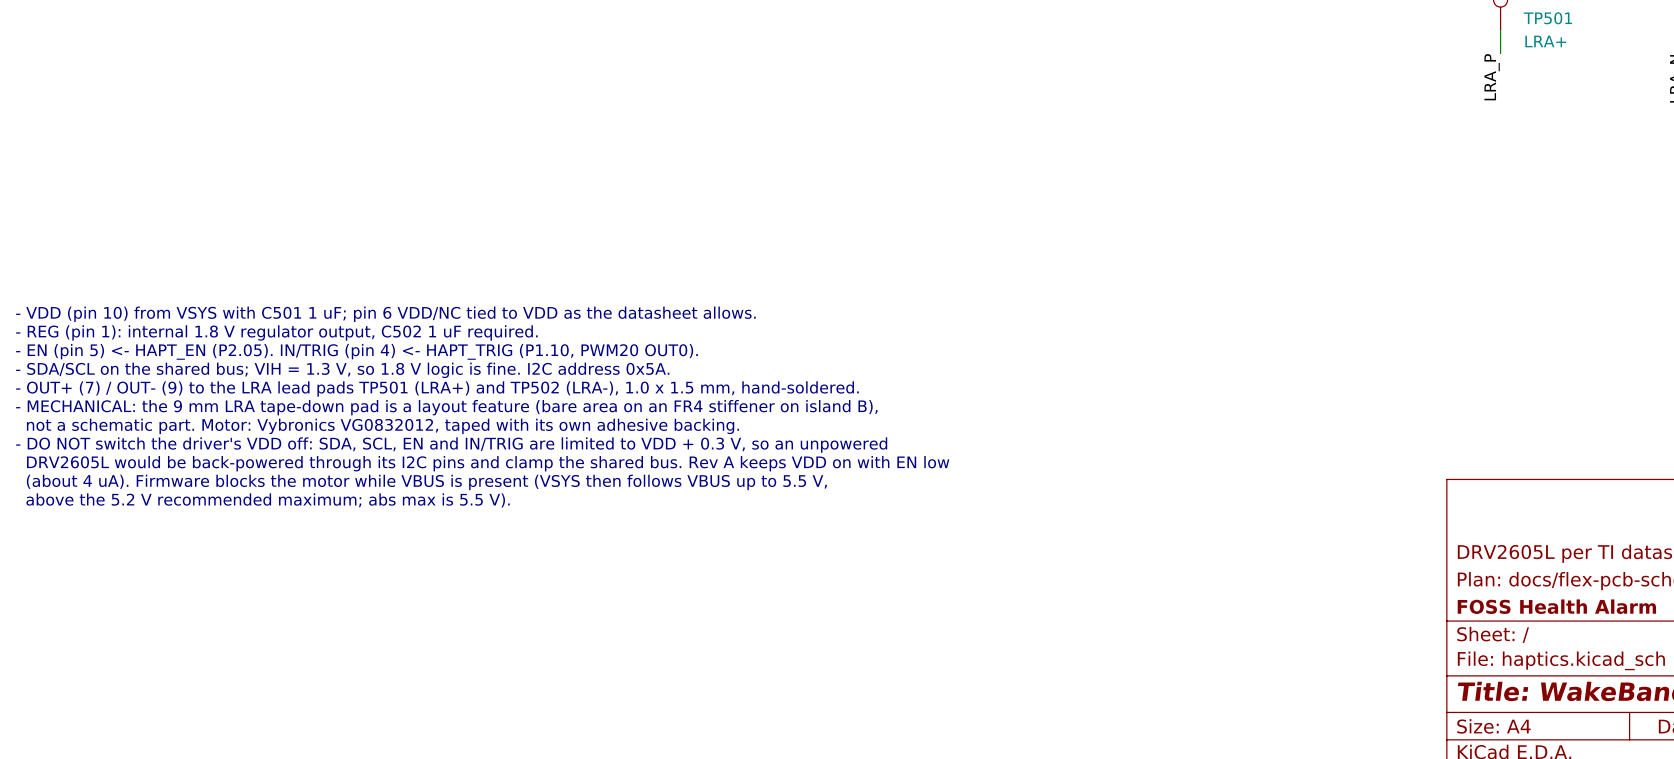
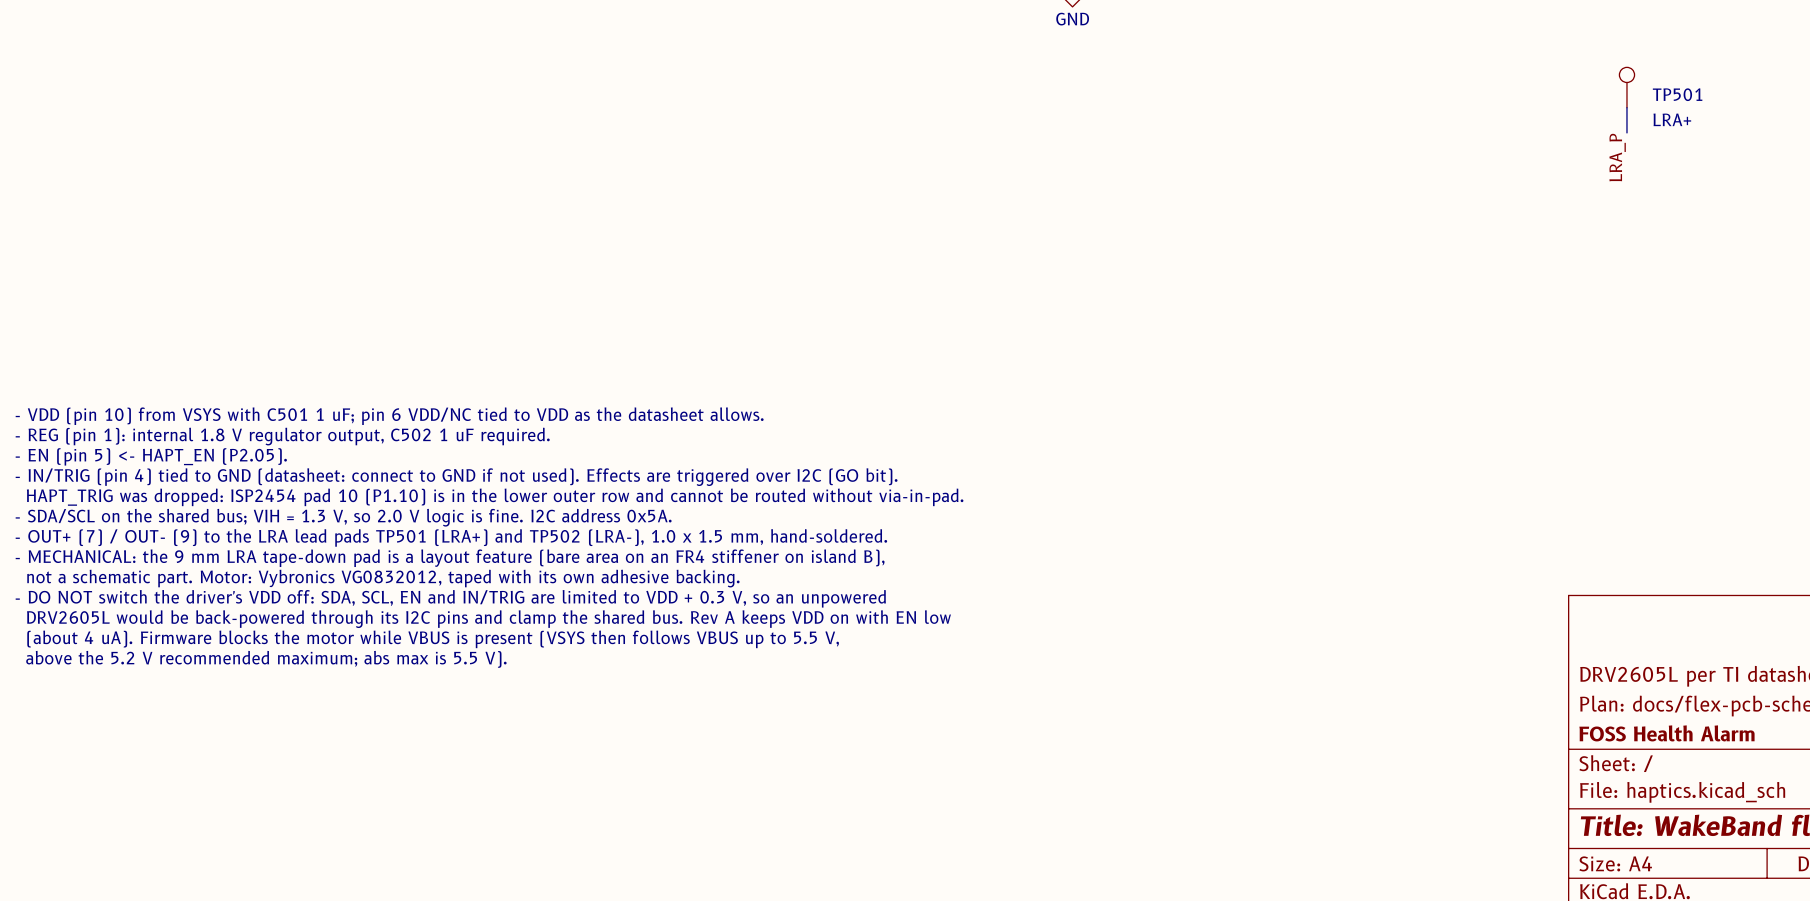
text: - EN (pin 5) <- HAPT_EN (P2.05). IN/TRIG (pin 4) <- HAPT_TRIG (P1.10, PWM20 OUT0). (356, 351) -> - EN (pin 5) <- HAPT_EN (P2.05). (151, 456)
text: - SDA/SCL on the shared bus; VIH = 1.3 V, so 1.8 V logic is fine. I2C address 0x5A. (342, 370) -> - IN/TRIG (pin 4) tied to GND (datasheet: connect to GND if not used). Effects are triggered over I2C (GO bit). (456, 477)
text: - OUT+ (7) / OUT- (9) to the LRA lead pads TP501 (LRA+) and TP502 (LRA-), 1.0 x 1.5 mm, hand-soldered. (437, 388) -> HAPT_TRIG was dropped: ISP2454 pad 10 (P1.10) is in the lower outer row and cannot be routed without via-in-pad. (495, 497)
text: - MECHANICAL: the 9 mm LRA tape-down pad is a layout feature (bare area on an FR4 stiffener on island B), (446, 407) -> - SDA/SCL on the shared bus; VIH = 1.3 V, so 2.0 V logic is fine. I2C address 0x5A. (343, 517)
text: not a schematic part. Motor: Vybronics VG0832012, taped with its own adhesive backing. (382, 426) -> - OUT+ (7) / OUT- (9) to the LRA lead pads TP501 (LRA+) and TP502 (LRA-), 1.0 x 1.5 mm, hand-soldered. (451, 537)
text: - DO NOT switch the driver's VDD off: SDA, SCL, EN and IN/TRIG are limited to VDD + 0.3 V, so an unpowered (451, 445) -> - MECHANICAL: the 9 mm LRA tape-down pad is a layout feature (bare area on an FR4 stiffener on island B), (450, 558)
text: DRV2605L would be back-powered through its I2C pins and clamp the shared bus. Rev A keeps VDD on with EN low (488, 463) -> not a schematic part. Motor: Vybronics VG0832012, taped with its own adhesive backing. (383, 578)
text: (about 4 uA). Firmware blocks the motor while VBUS is present (VSYS then follows VBUS up to 5.5 V, (426, 482) -> - DO NOT switch the driver's VDD off: SDA, SCL, EN and IN/TRIG are limited to VDD + 0.3 V, so an unpowered (450, 598)
text: above the 5.2 V recommended maximum; abs max is 5.5 V). (268, 500) -> DRV2605L would be back-powered through its I2C pins and clamp the shared bus. Rev A keeps VDD on with EN low (488, 619)
text: none -> (about 4 uA). Firmware blocks the motor while VBUS is present (VSYS then follows VBUS up to 5.5 V, (433, 639)
text: none -> above the 5.2 V recommended maximum; abs max is 5.5 V). (266, 659)

